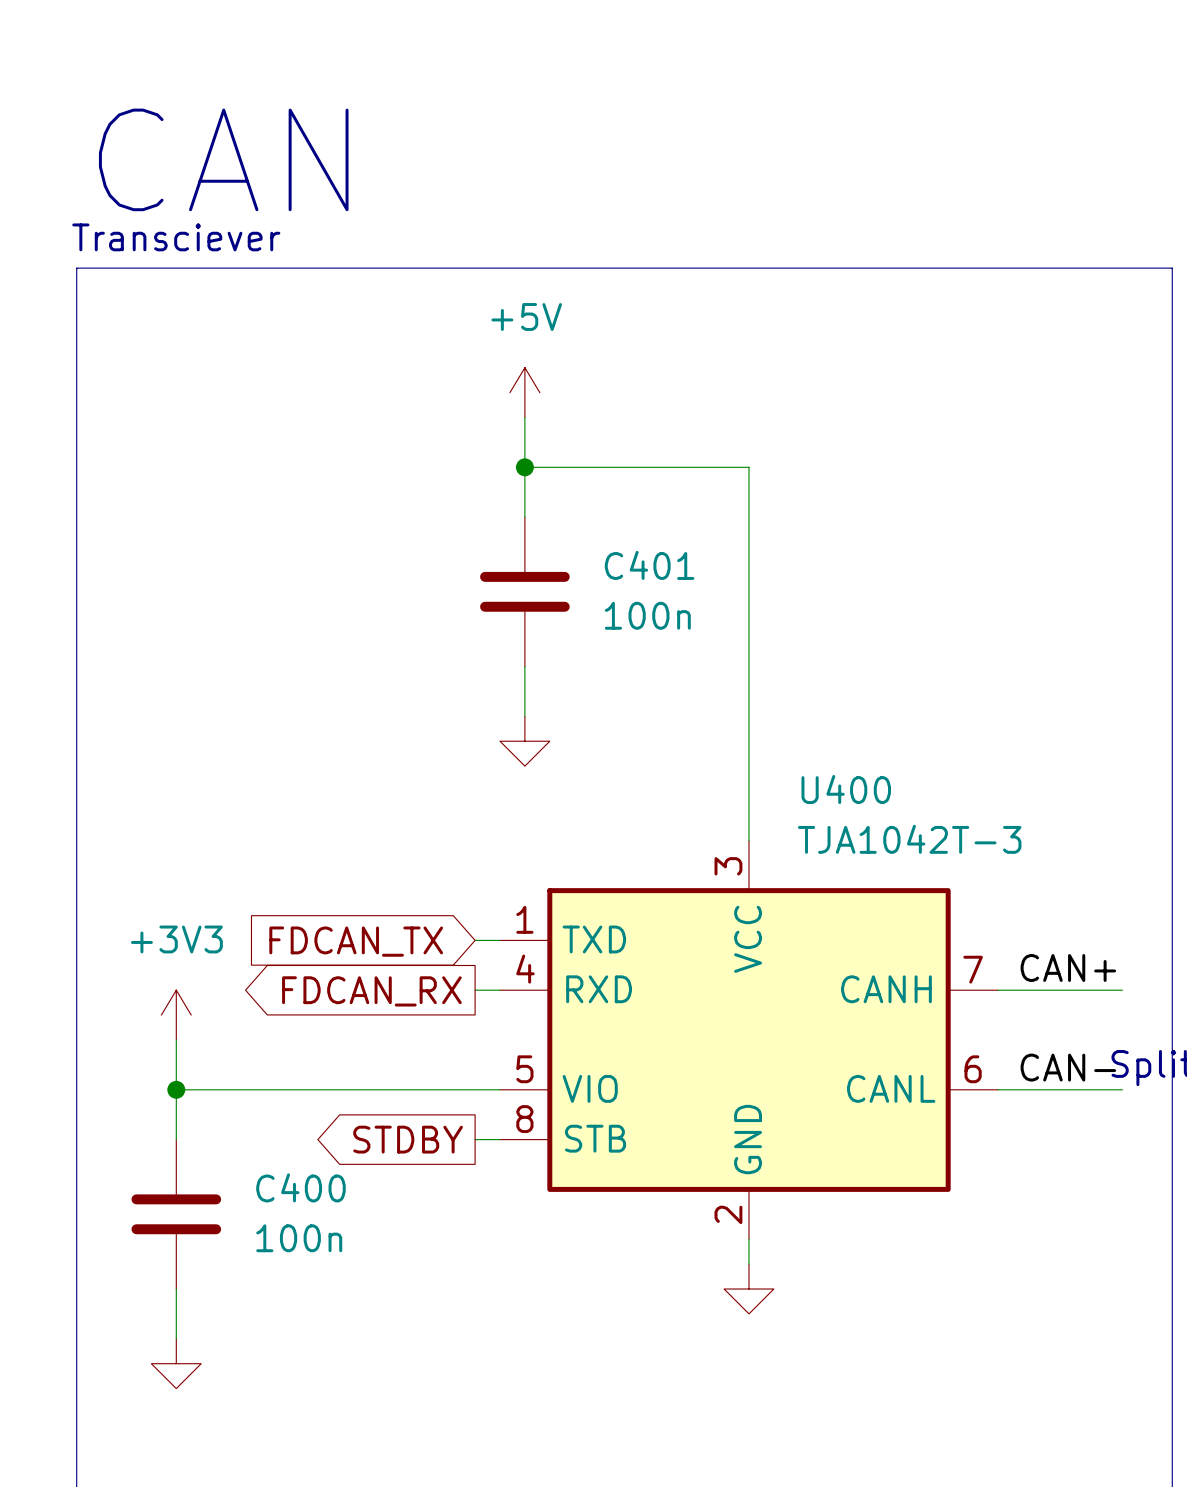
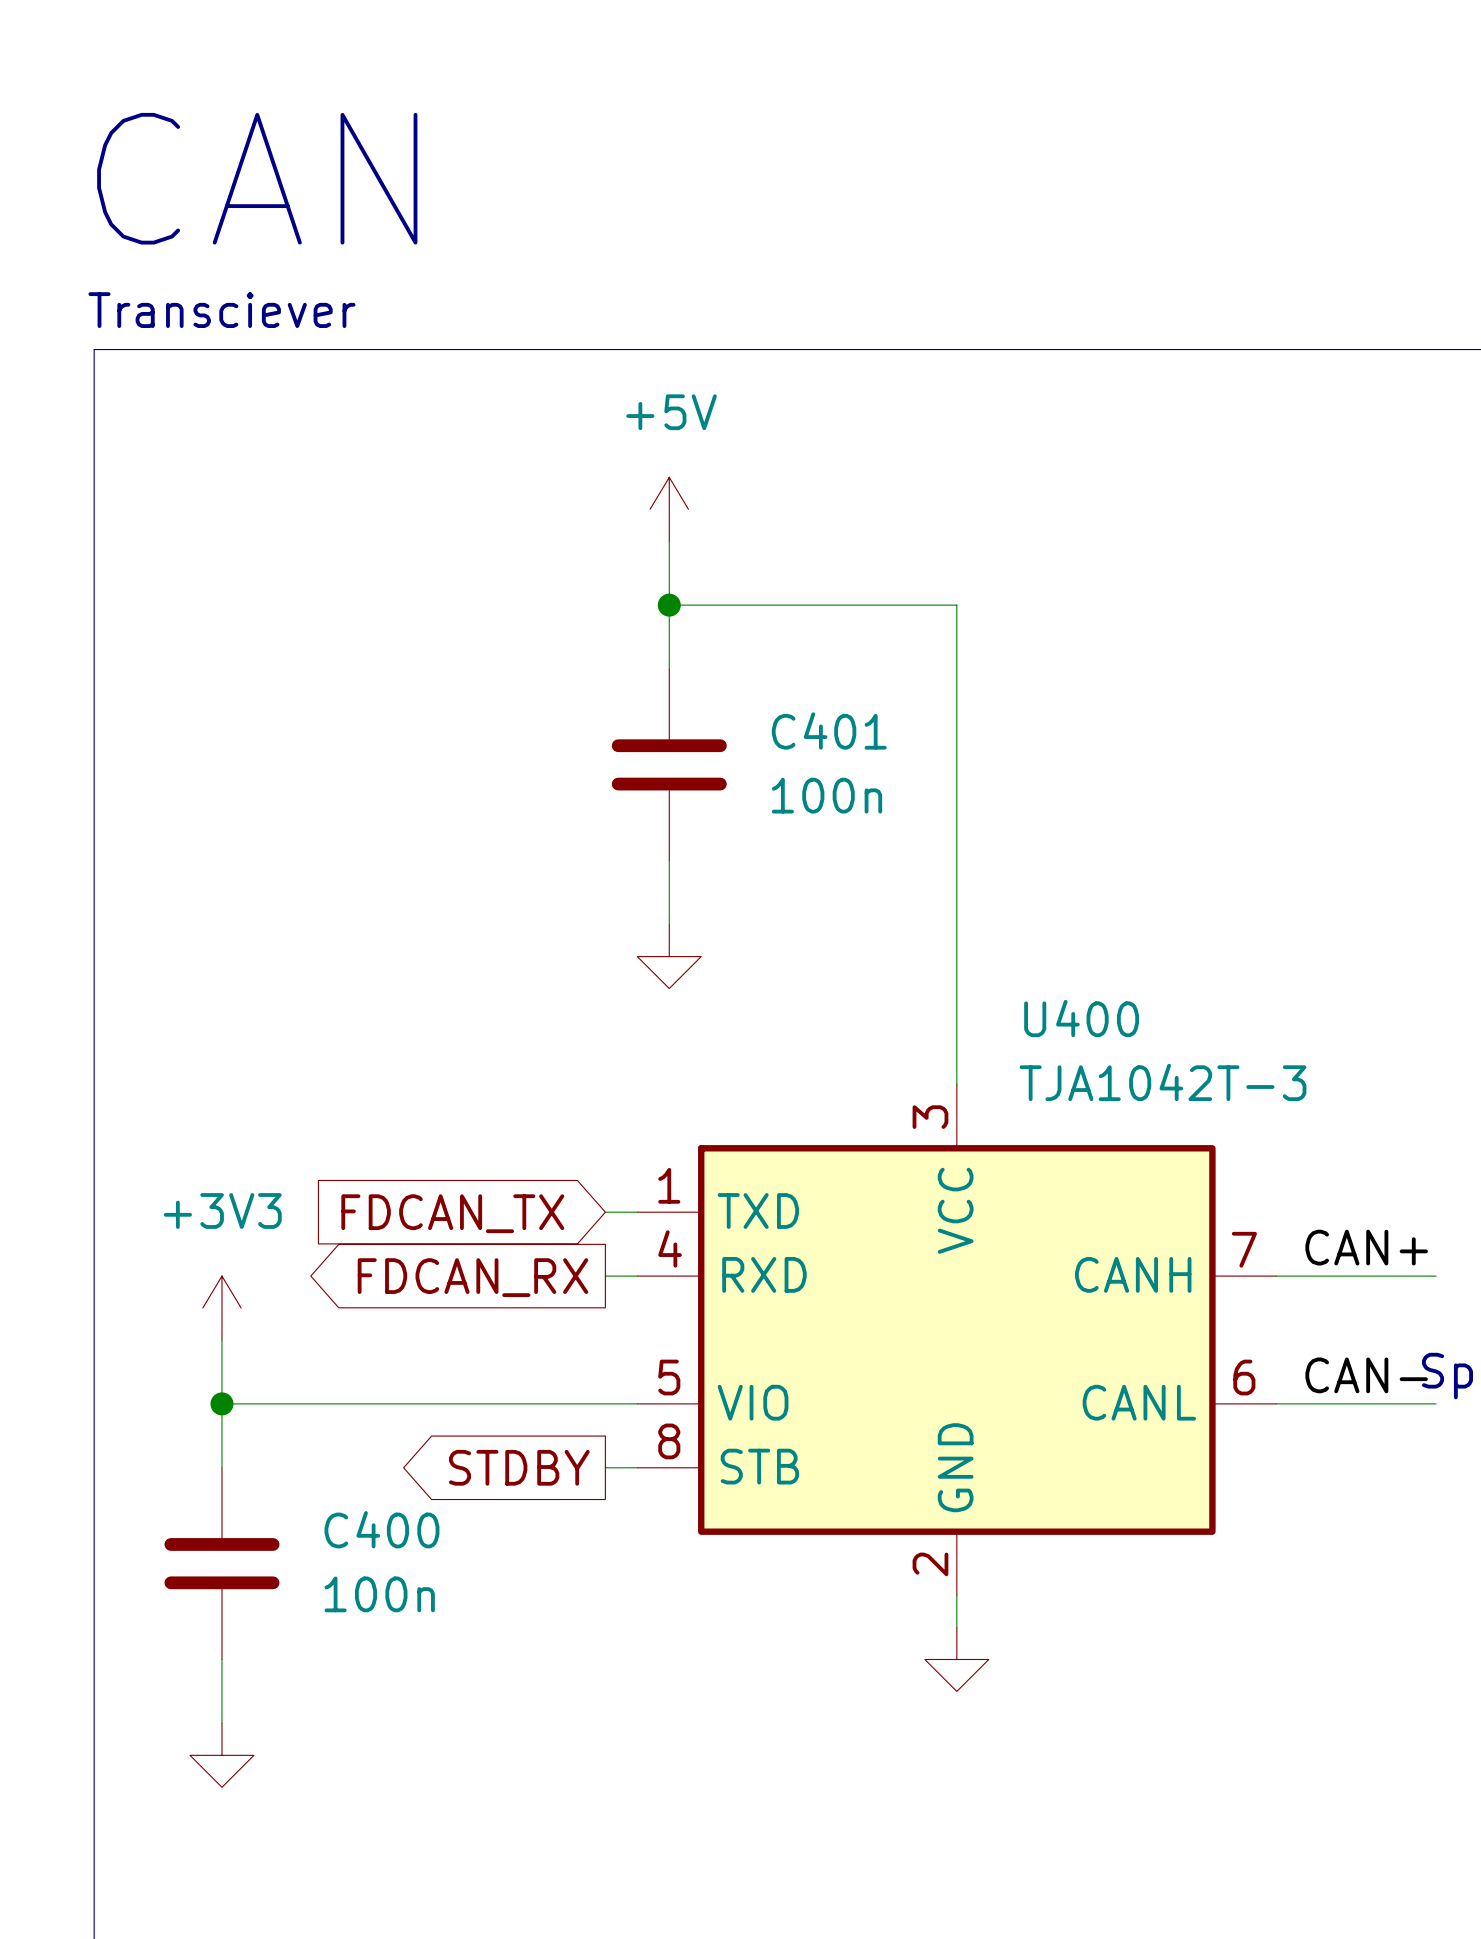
text position: CAN (223, 159) -> CAN (257, 178)

